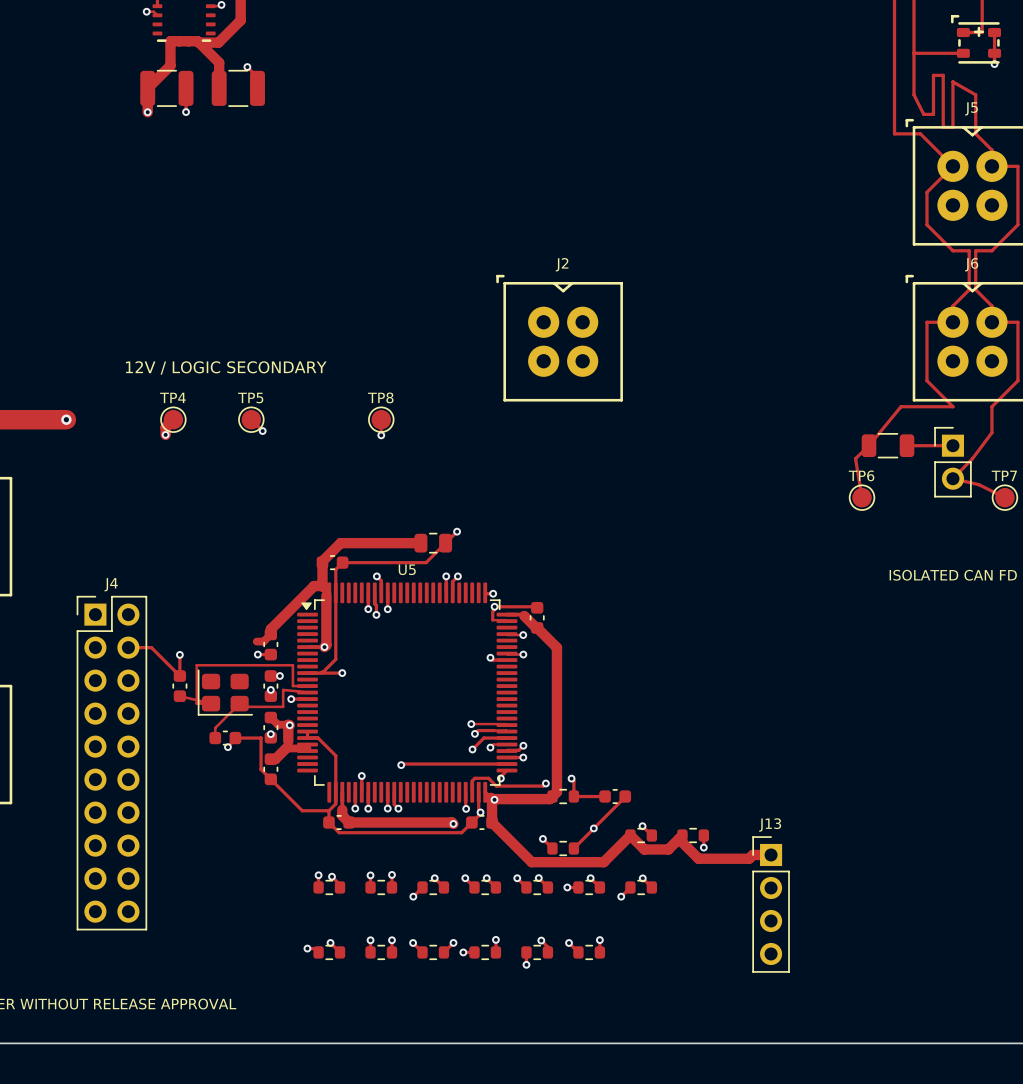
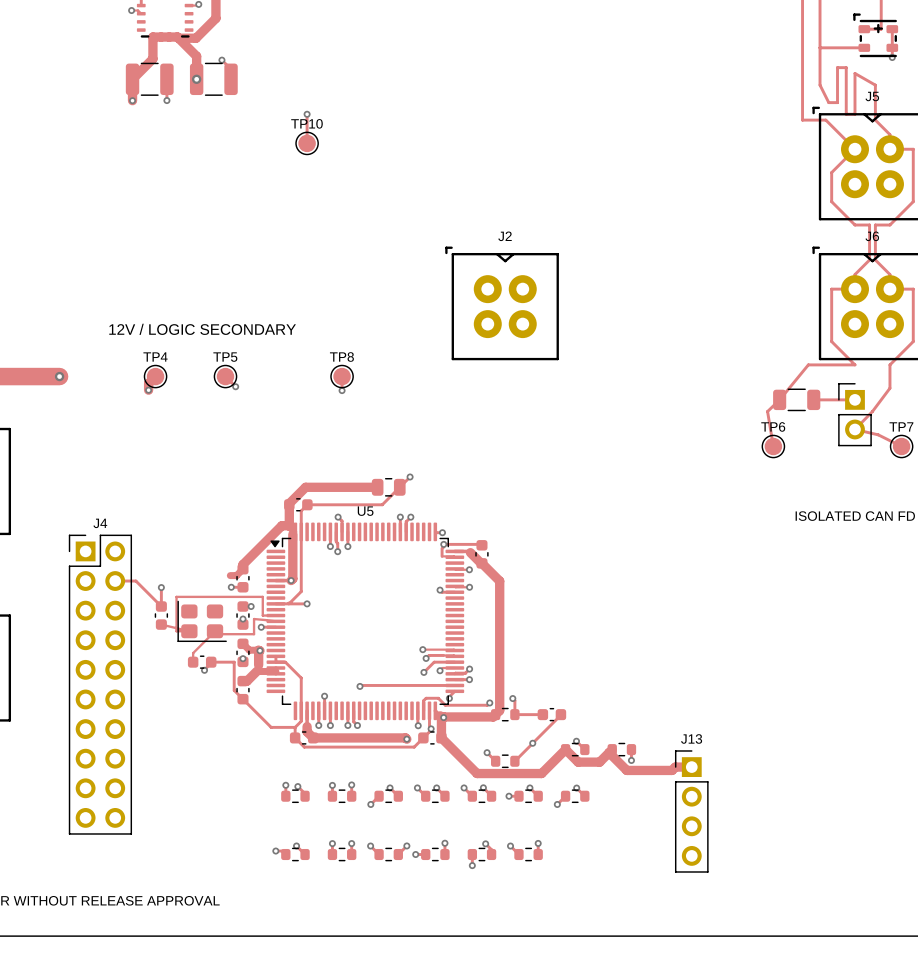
via: none -> (196, 79)
track: none -> (307, 114) (307, 143)
via: none -> (307, 114)
TP10: none -> (307, 143)

